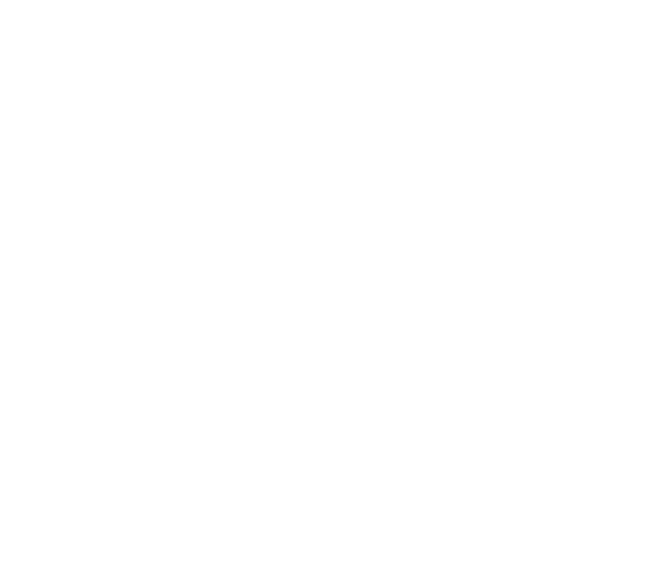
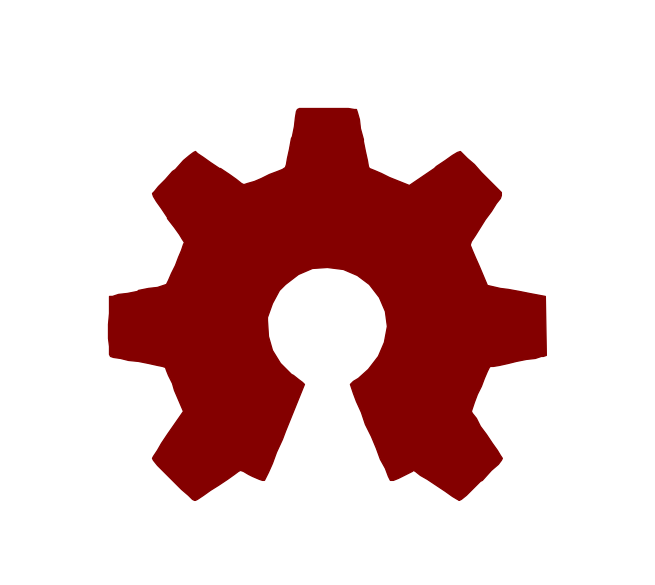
part: none -> (327, 304)

